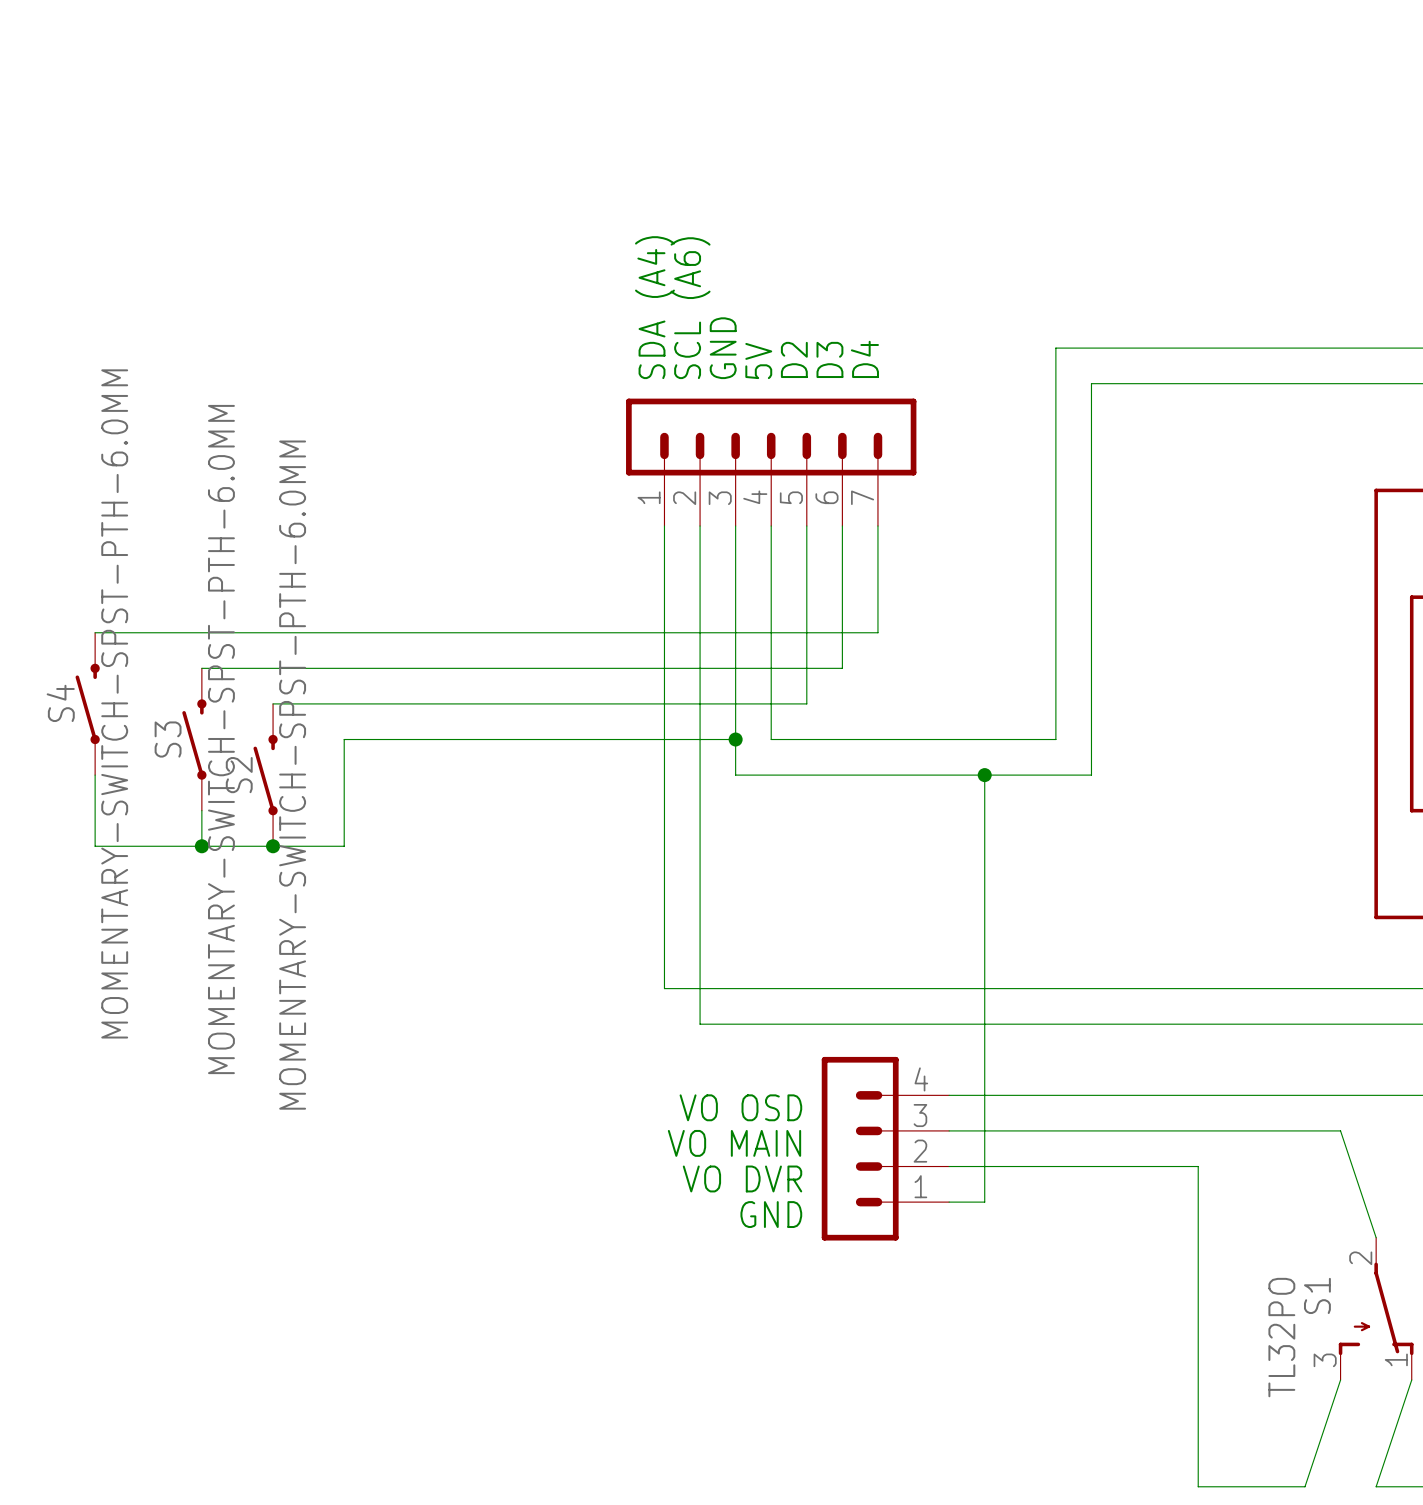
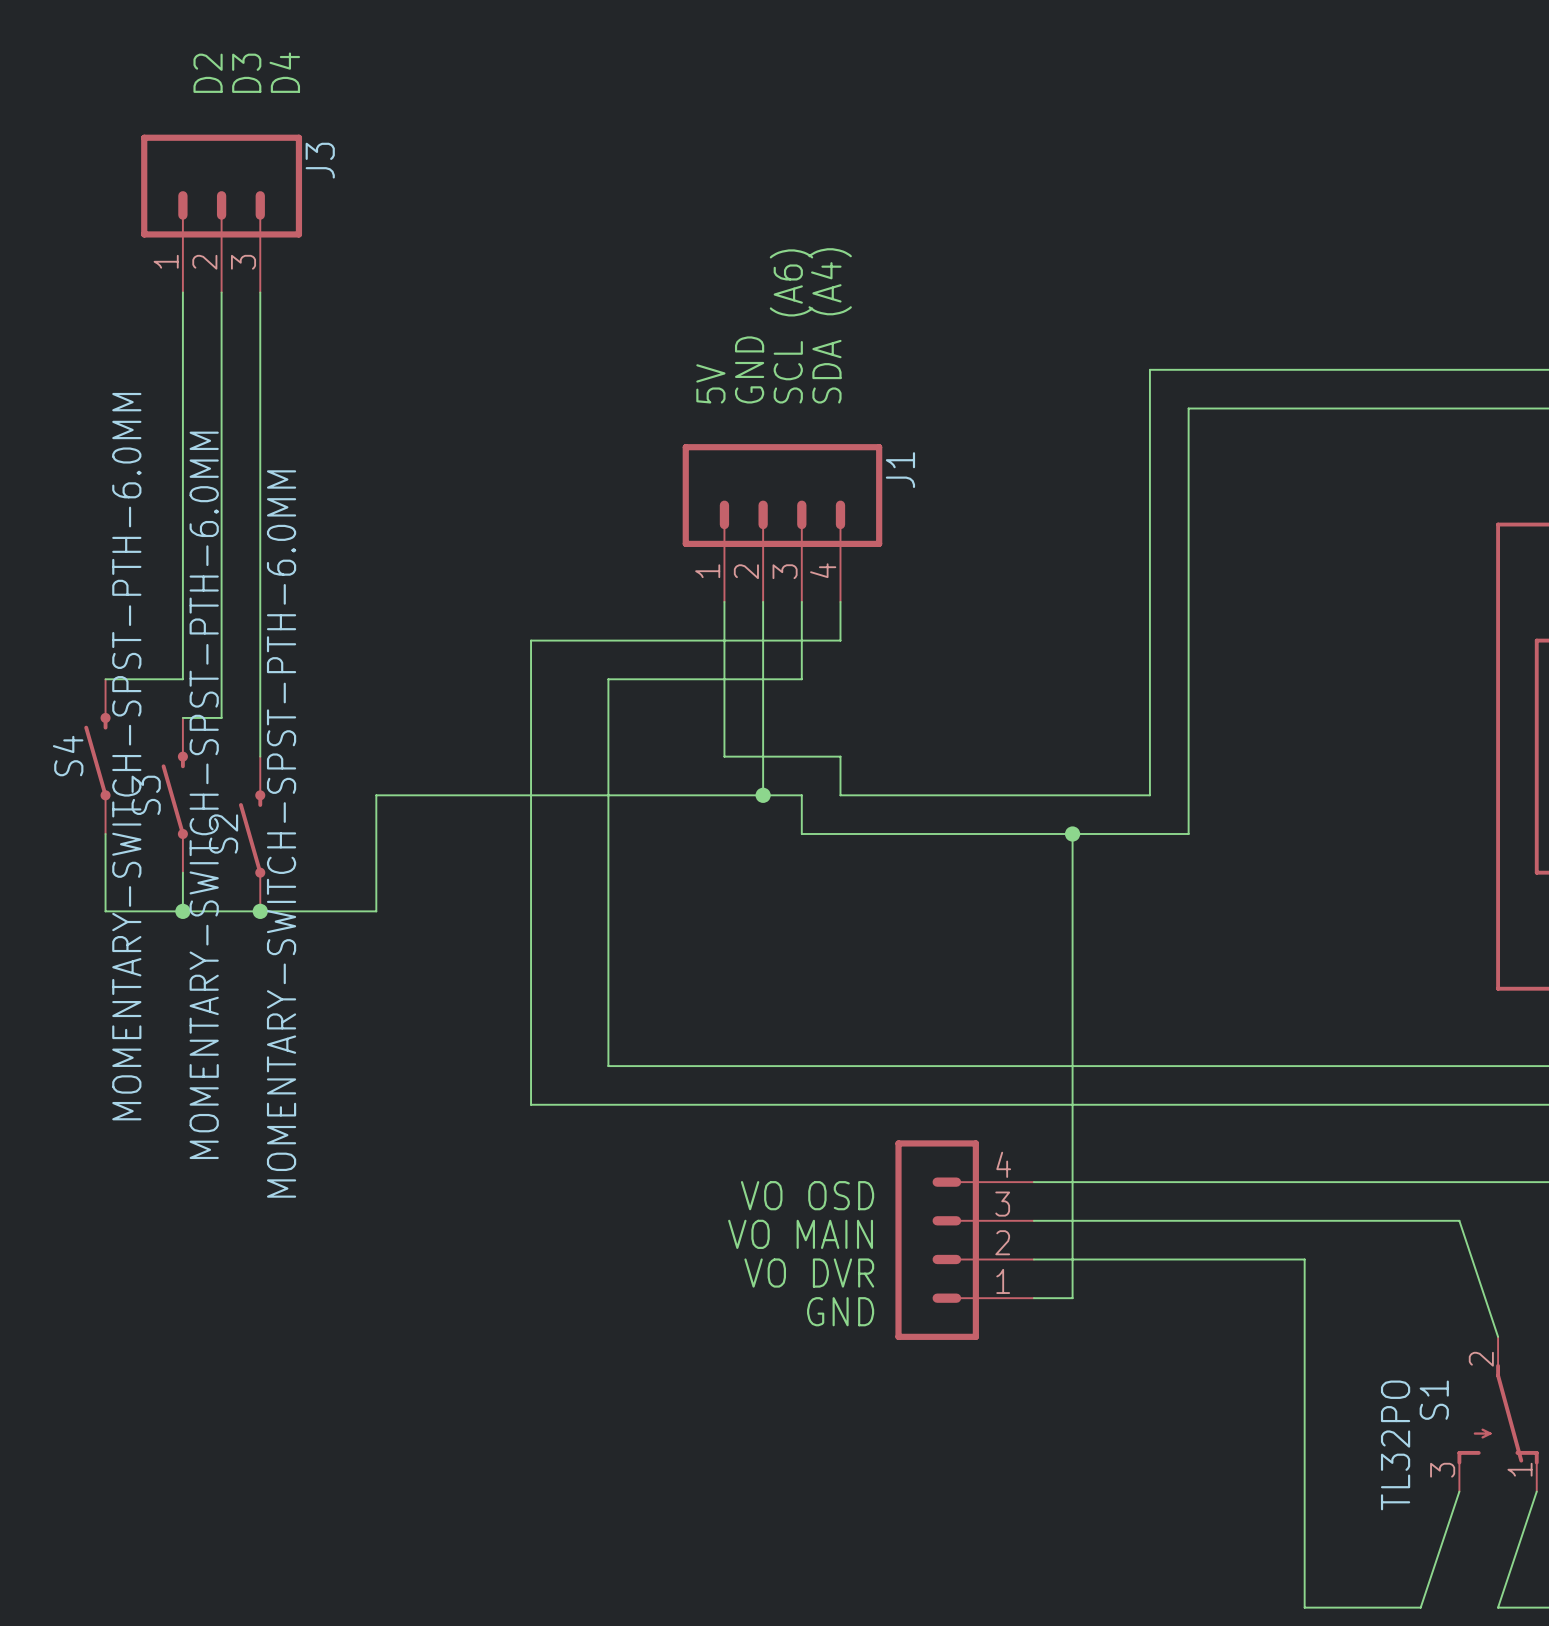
text: none -> D4 (284, 72)
text: none -> D2 (208, 73)
text: none -> D3 (246, 73)
J3: none -> (221, 213)
wire: none -> (221, 292) (221, 717) (182, 717)
wire: none -> (260, 292) (260, 756)
text: SDA (A4) (654, 307) -> 5V (710, 383)
text: SCL (A6) (690, 308) -> GND (749, 369)
text: GND (723, 348) -> SCL (A6) (791, 326)
text: D2 (794, 359) -> none
text: D3 (829, 359) -> none
text: D4 (864, 359) -> none
text: 5V (758, 361) -> SDA (A4) (830, 325)
part: (771, 462) -> none
J1: none -> (782, 523)
wire: (806, 526) (806, 703) (771, 703) (771, 597) -> none
wire: (842, 526) (842, 668) (201, 668) -> none
wire: (877, 526) (877, 632) (735, 632) (735, 739) -> none
wire: (166, 632) (557, 632) -> (182, 679) (182, 292)
wire: (273, 703) (664, 703) (664, 988) -> (608, 679) (608, 1066) (724, 1066)
S3 position: (194, 739) -> (174, 795)
wire: (700, 739) (700, 1024) -> (840, 640) (531, 640) (531, 1104) (763, 1104)
junction position: (735, 739) -> (763, 795)
S2 position: (265, 775) -> (252, 834)
wire: (201, 810) (201, 846) -> (182, 872) (182, 911)
junction: none -> (182, 911)
junction: (201, 846) -> none
junction: none -> (260, 911)
junction: (273, 846) -> none

